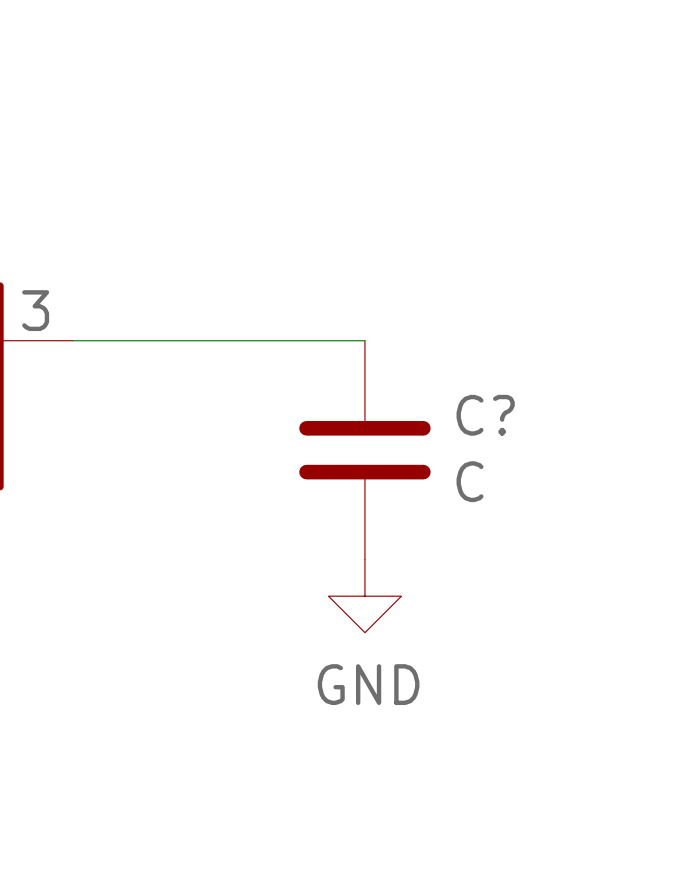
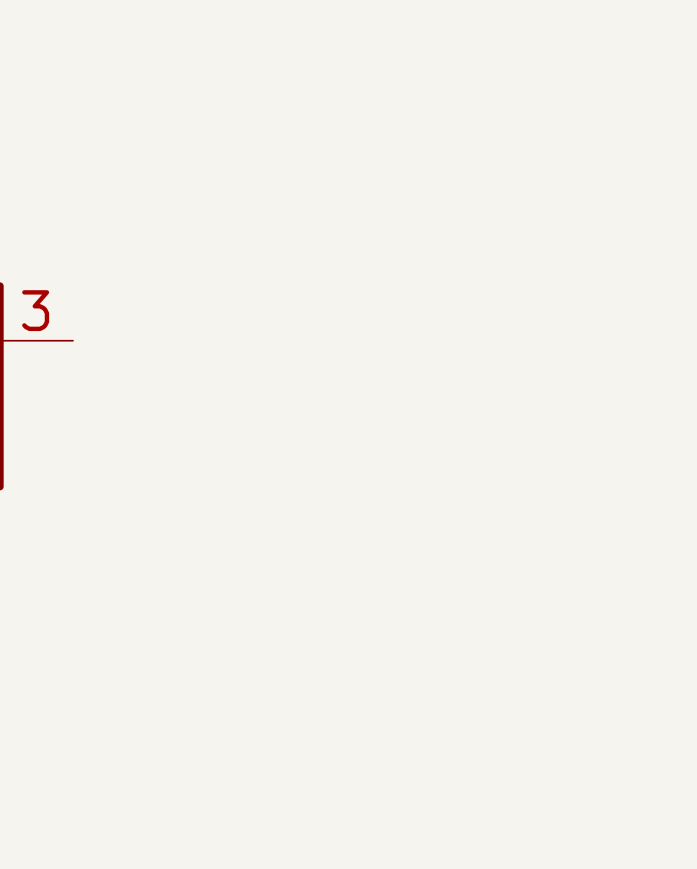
wire: (73, 340) (364, 340) -> none
C?: C (364, 450) -> none
power symbol: GND (364, 596) -> none

